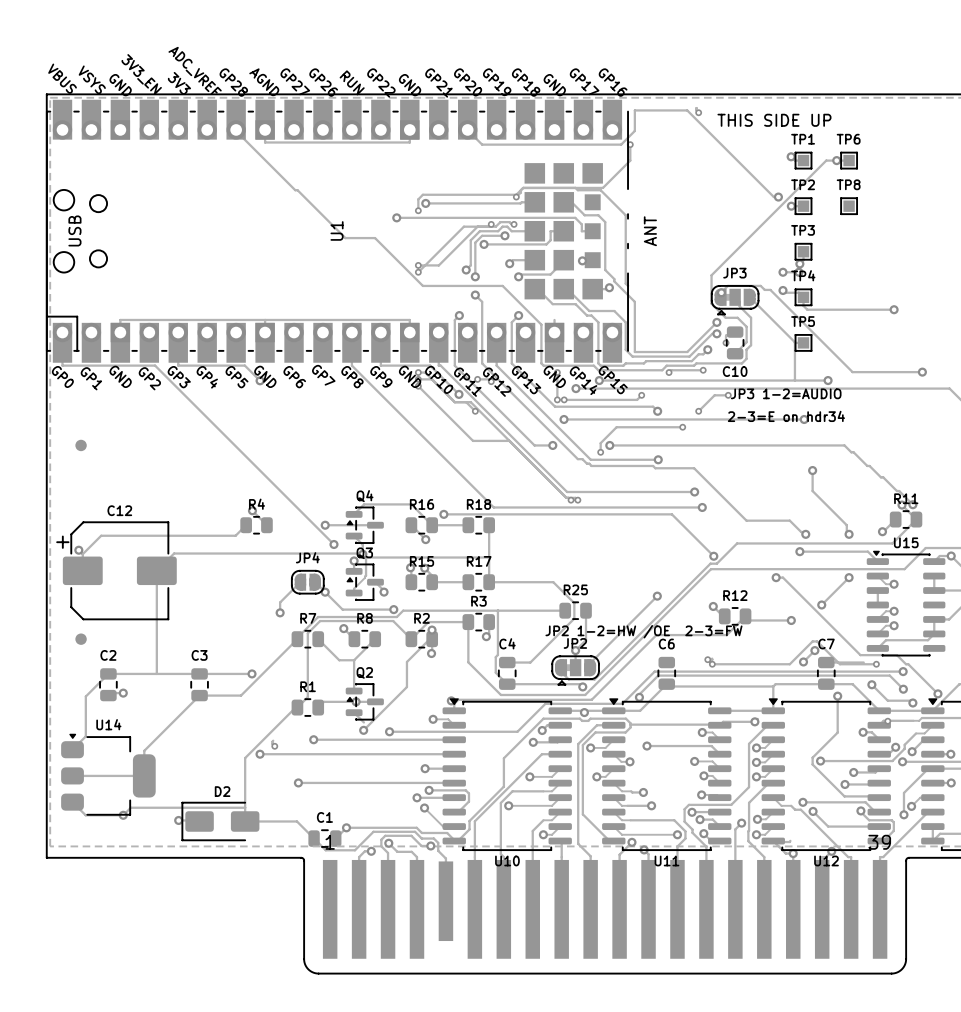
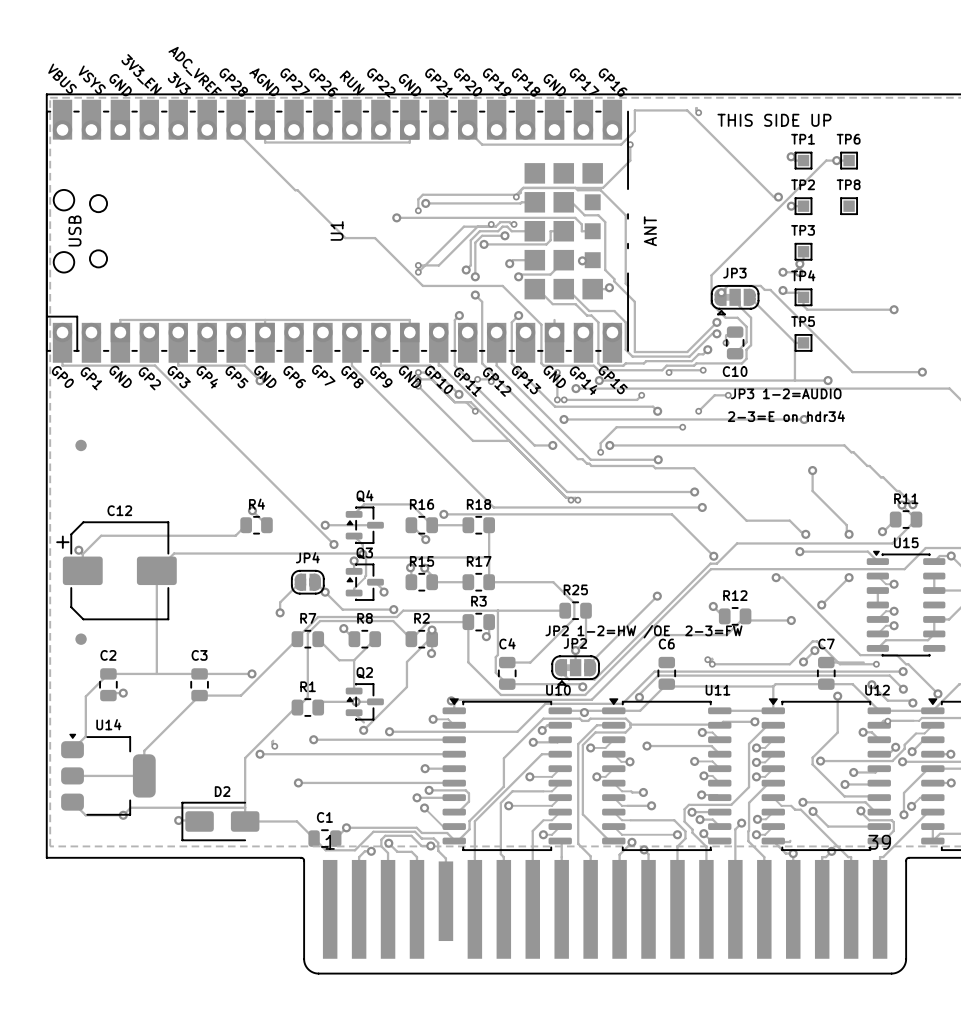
U10 name position: U10 (507, 860) -> U10 (558, 690)
U11 name position: U11 (666, 860) -> U11 (717, 690)
U12 name position: U12 (826, 860) -> U12 (877, 690)

